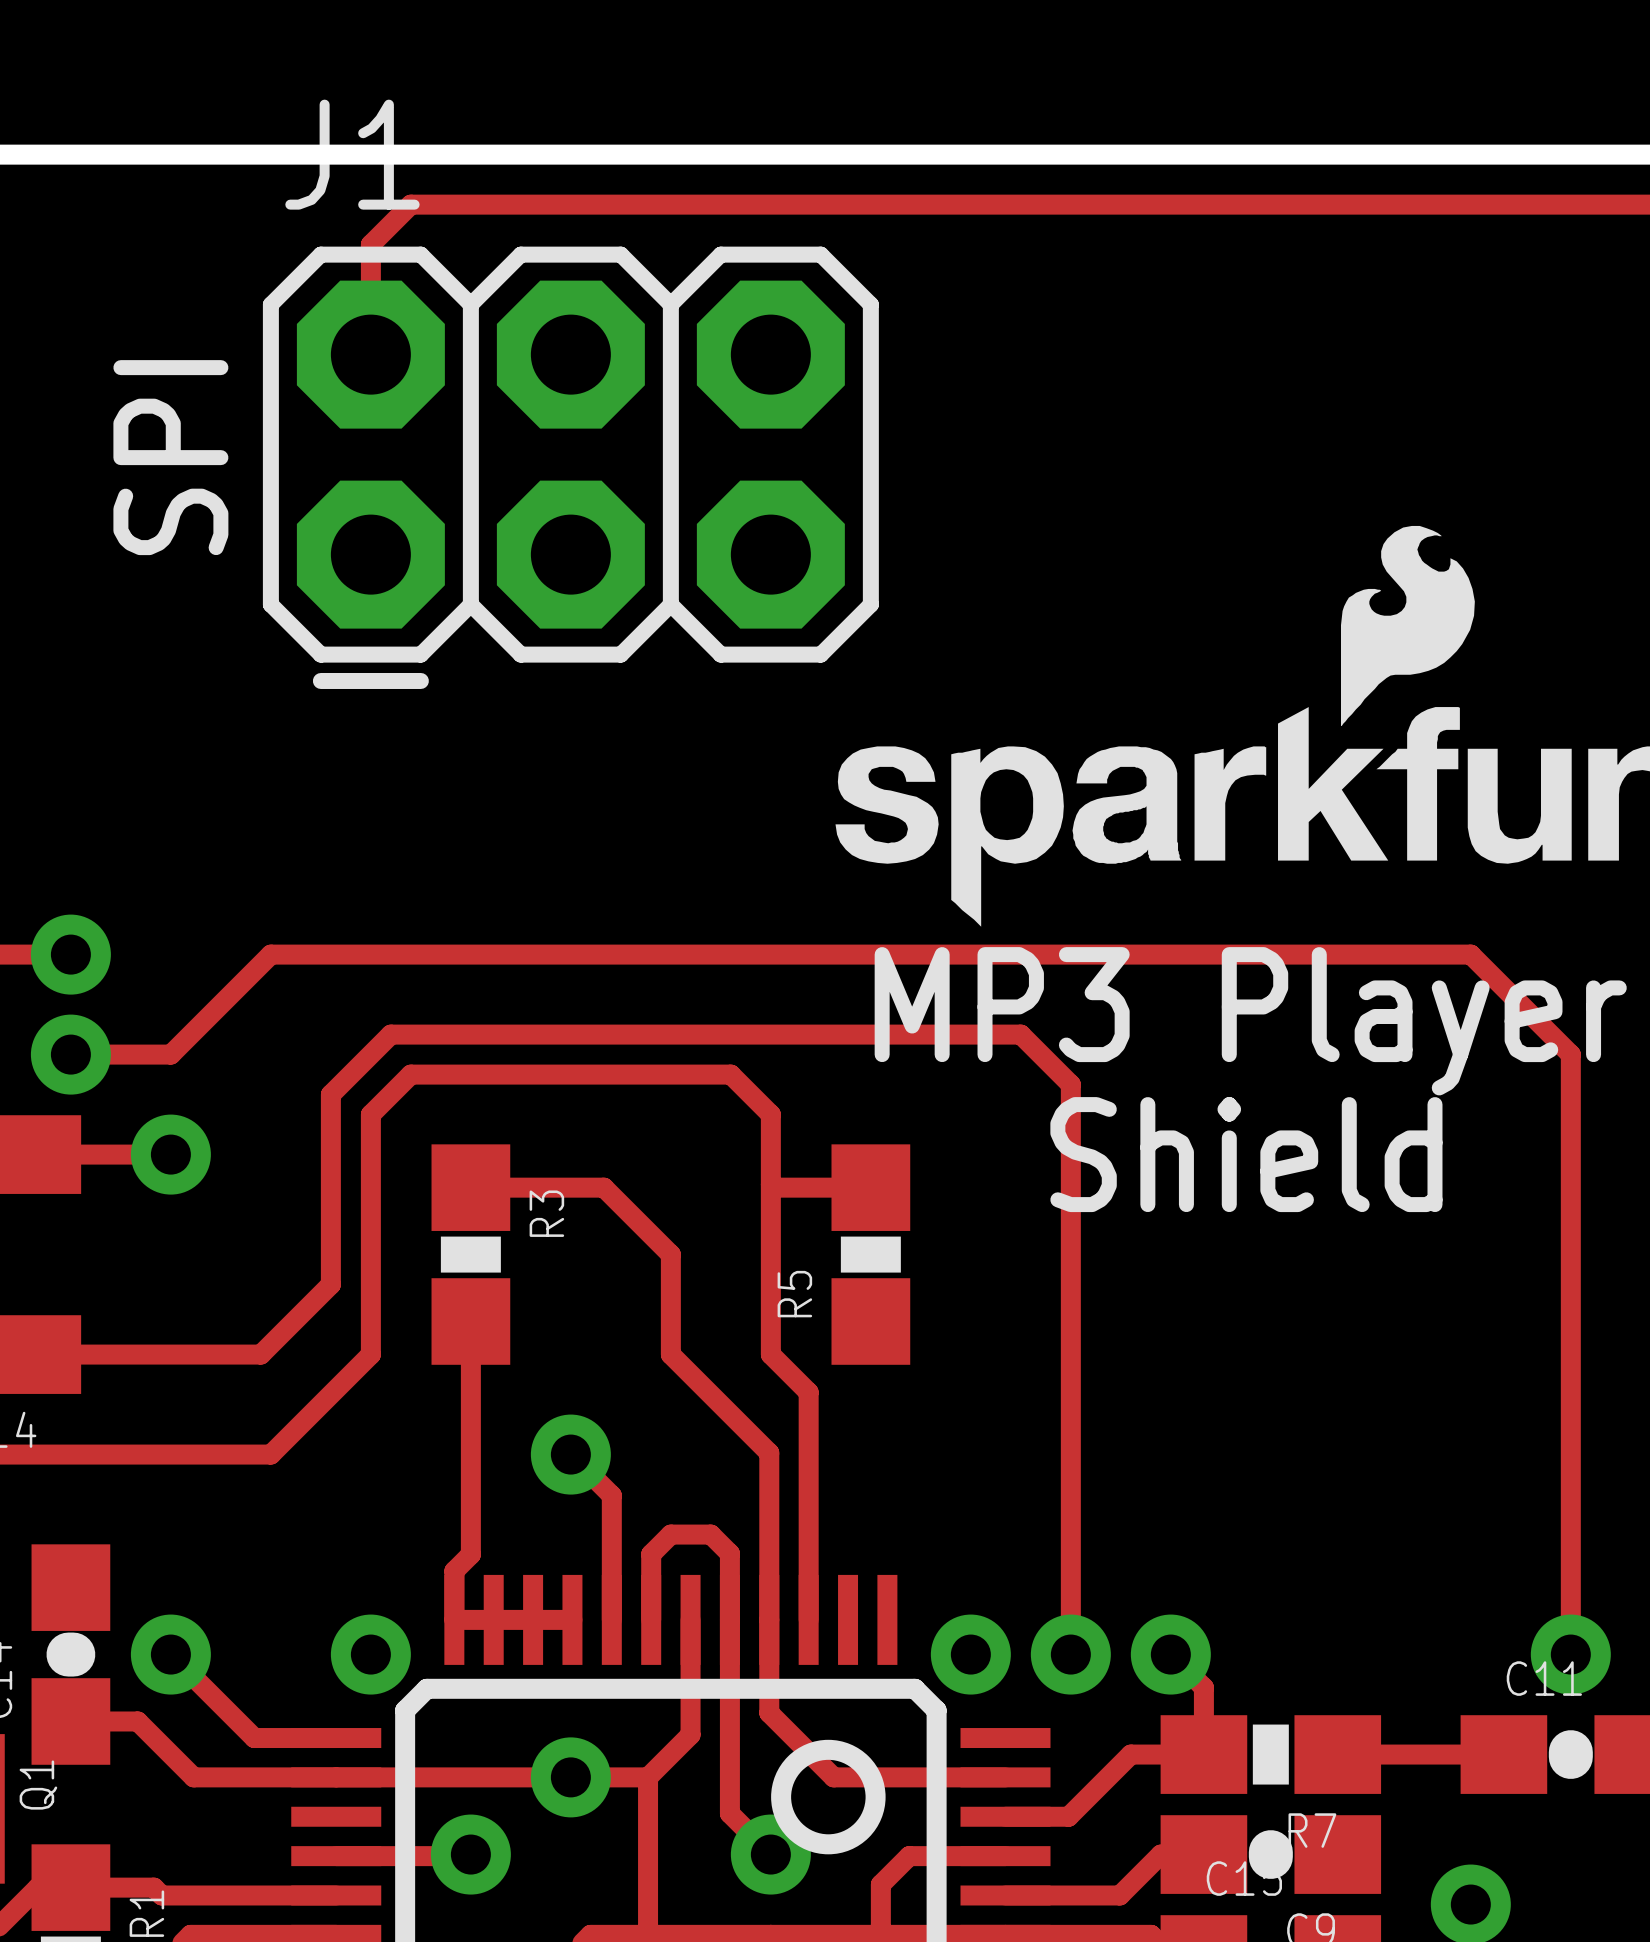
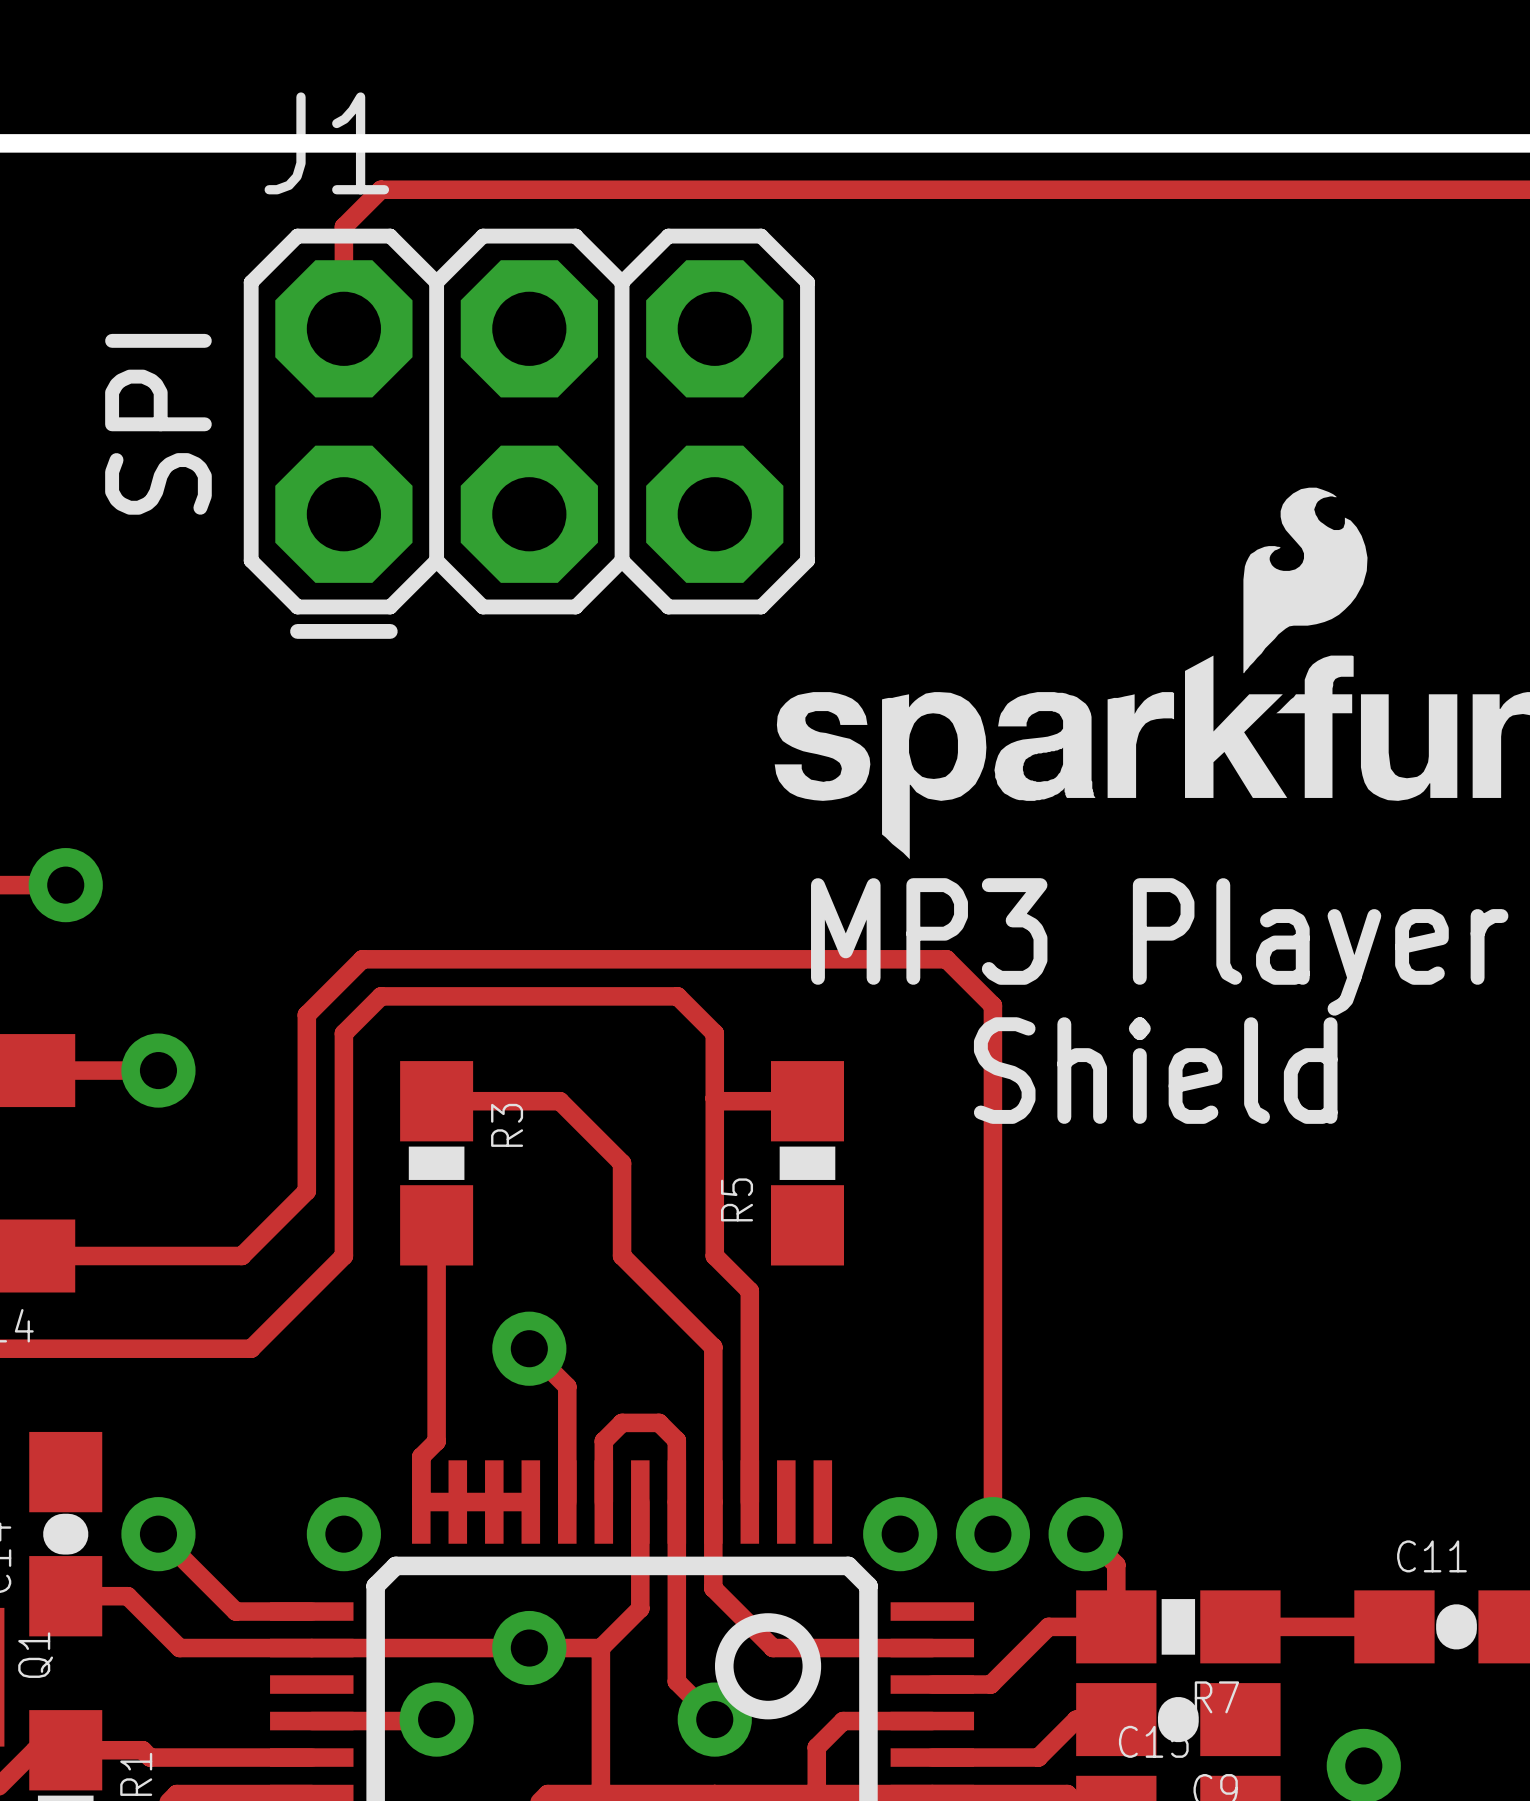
track: (70, 1054) (170, 1054) (270, 954) (1470, 954) (1570, 1054) (1570, 1654) -> none
via: (70, 1054) -> none
via: (1570, 1654) -> none

